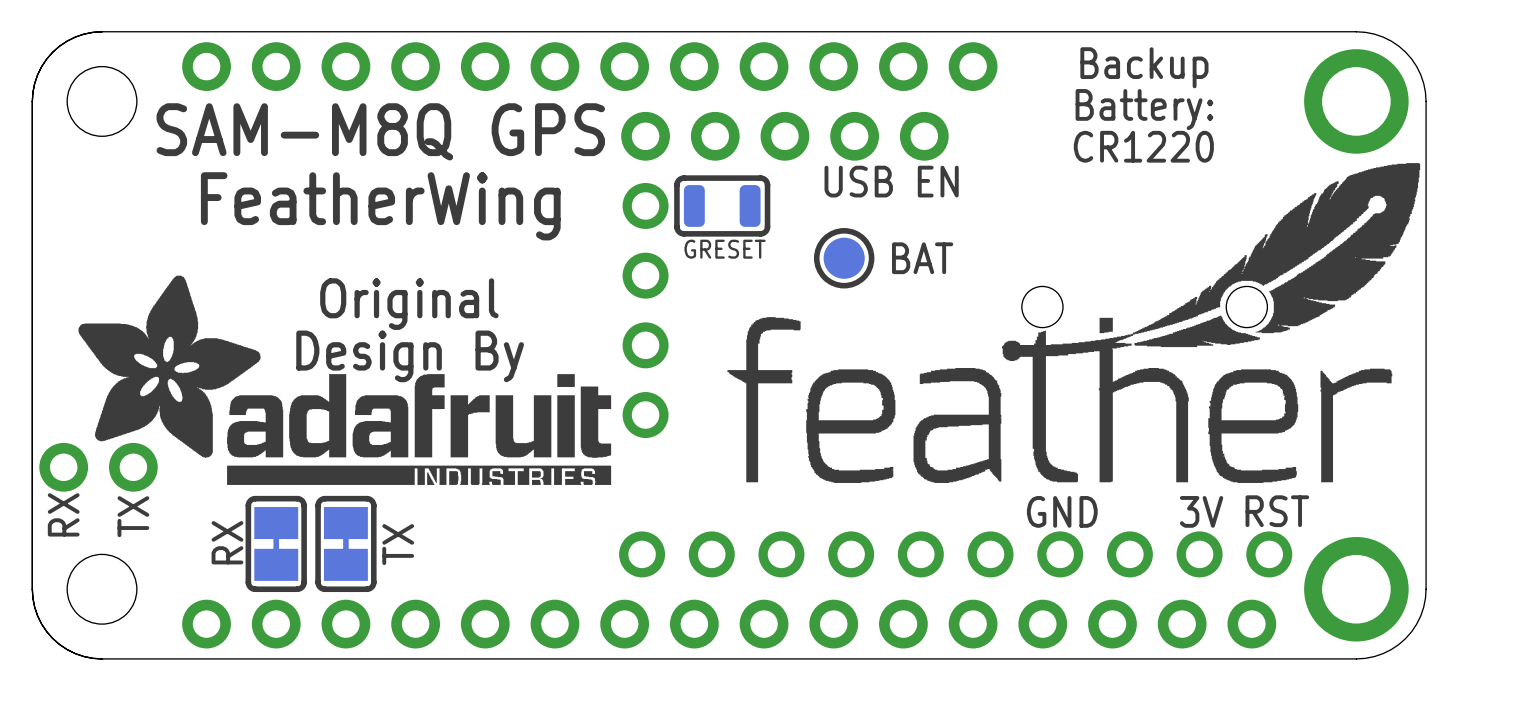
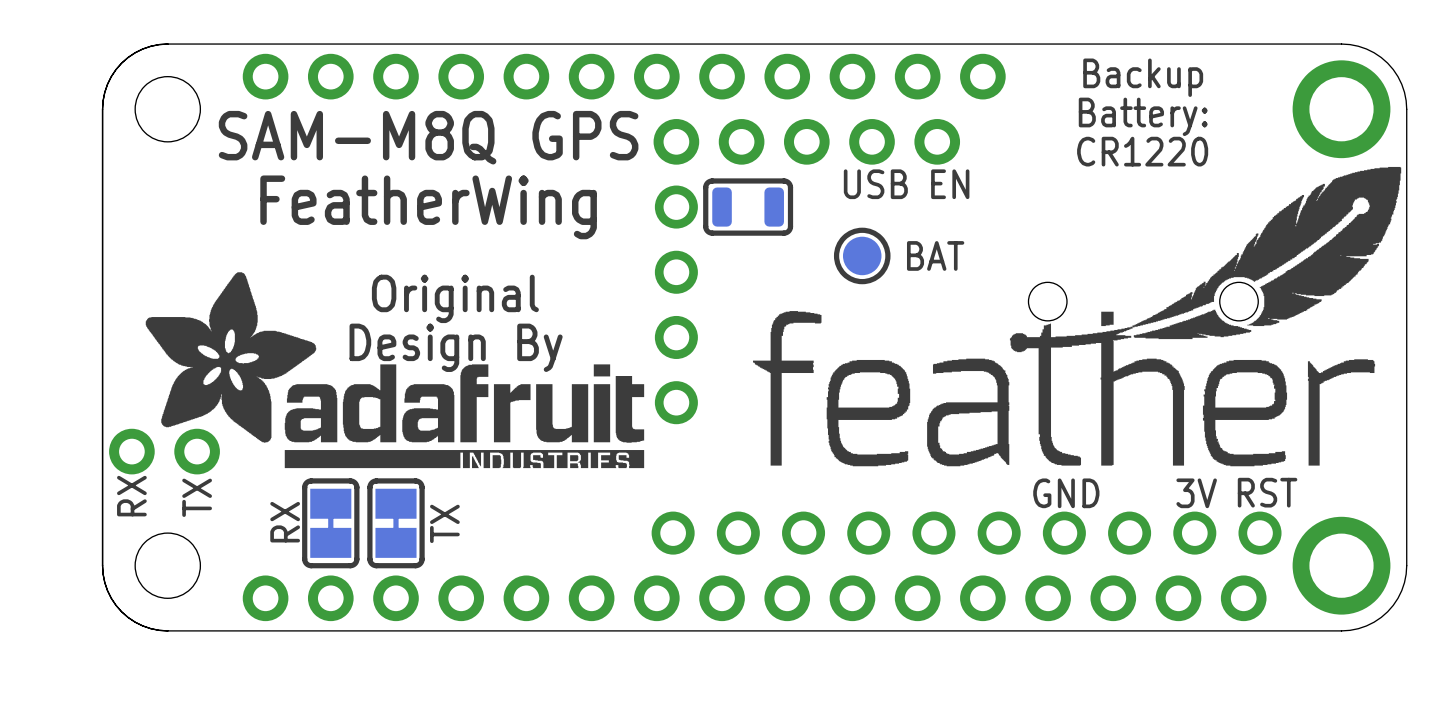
text: GRESET (725, 249) -> none

